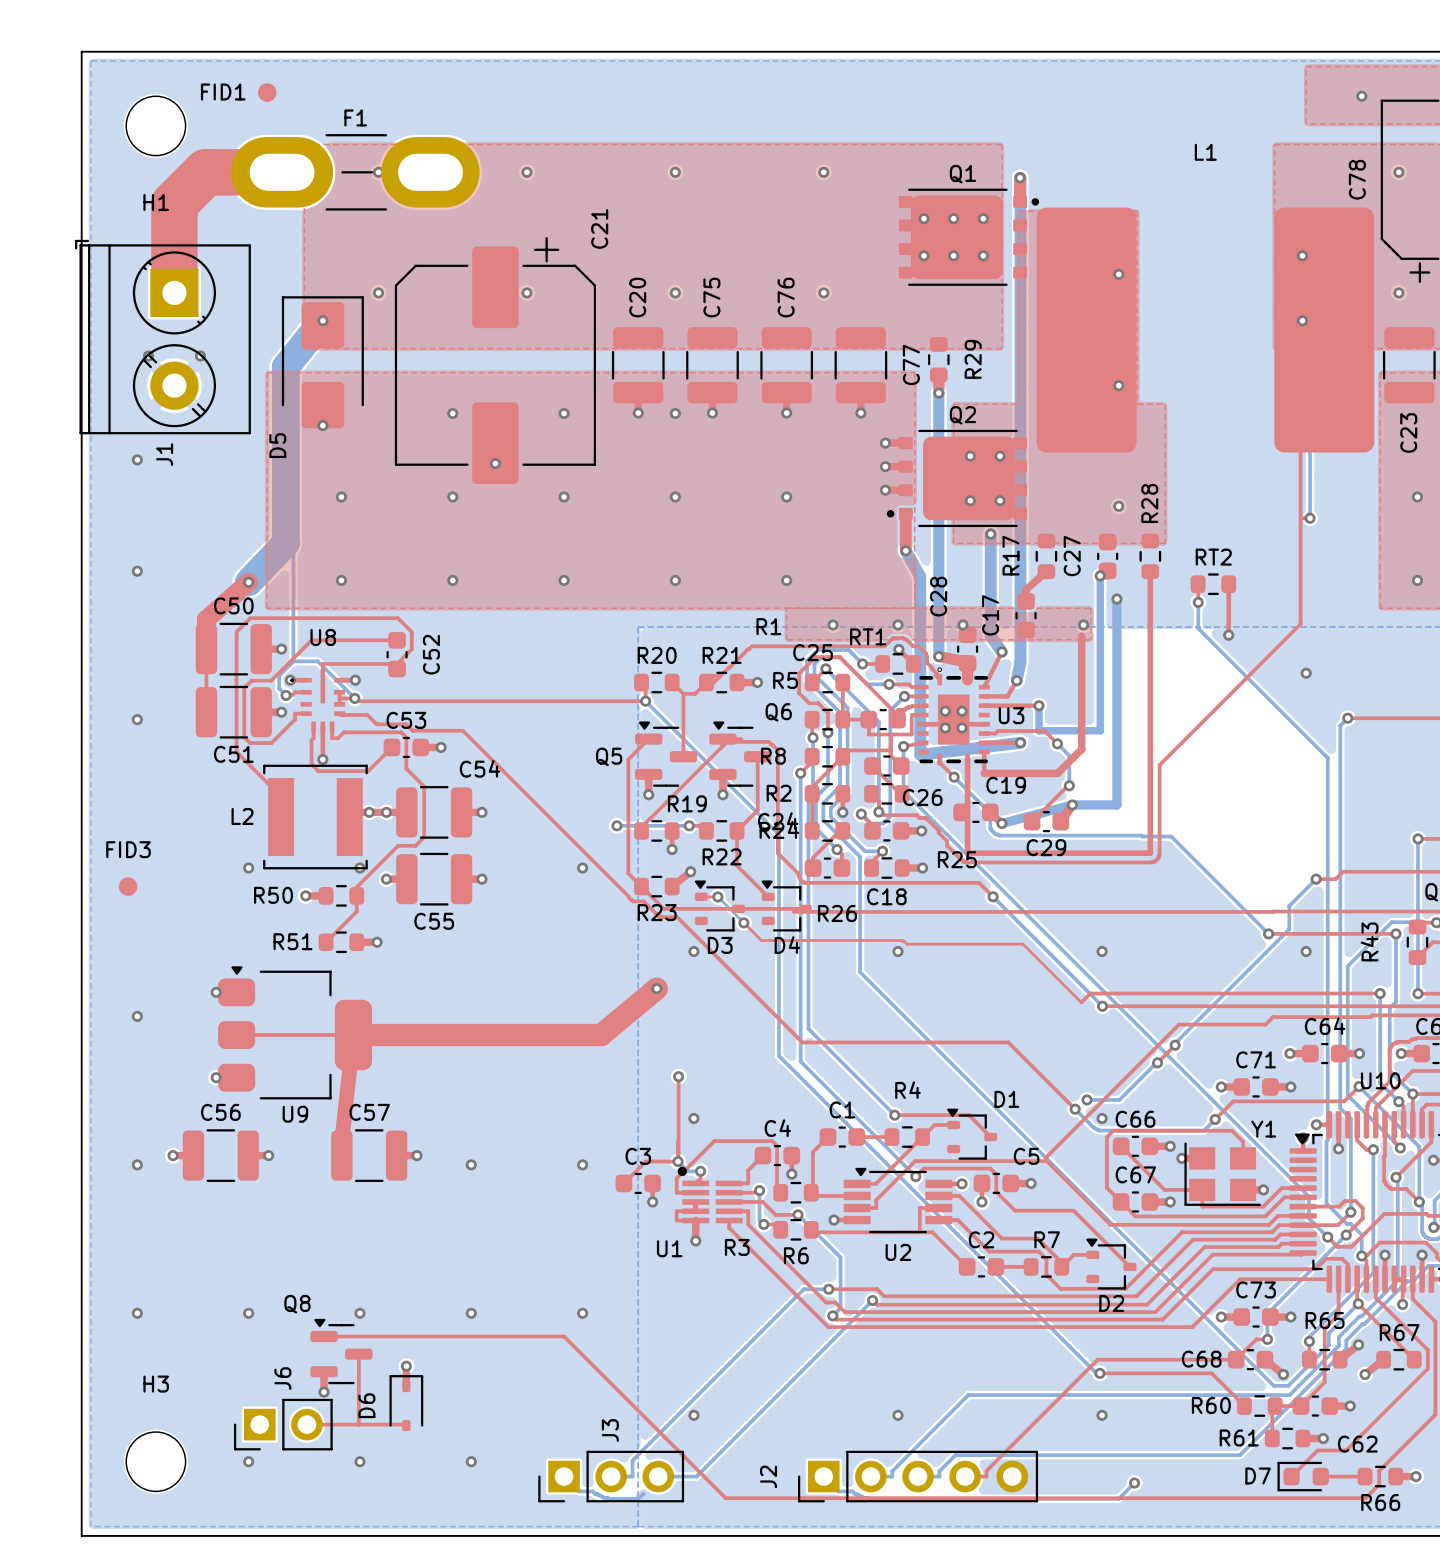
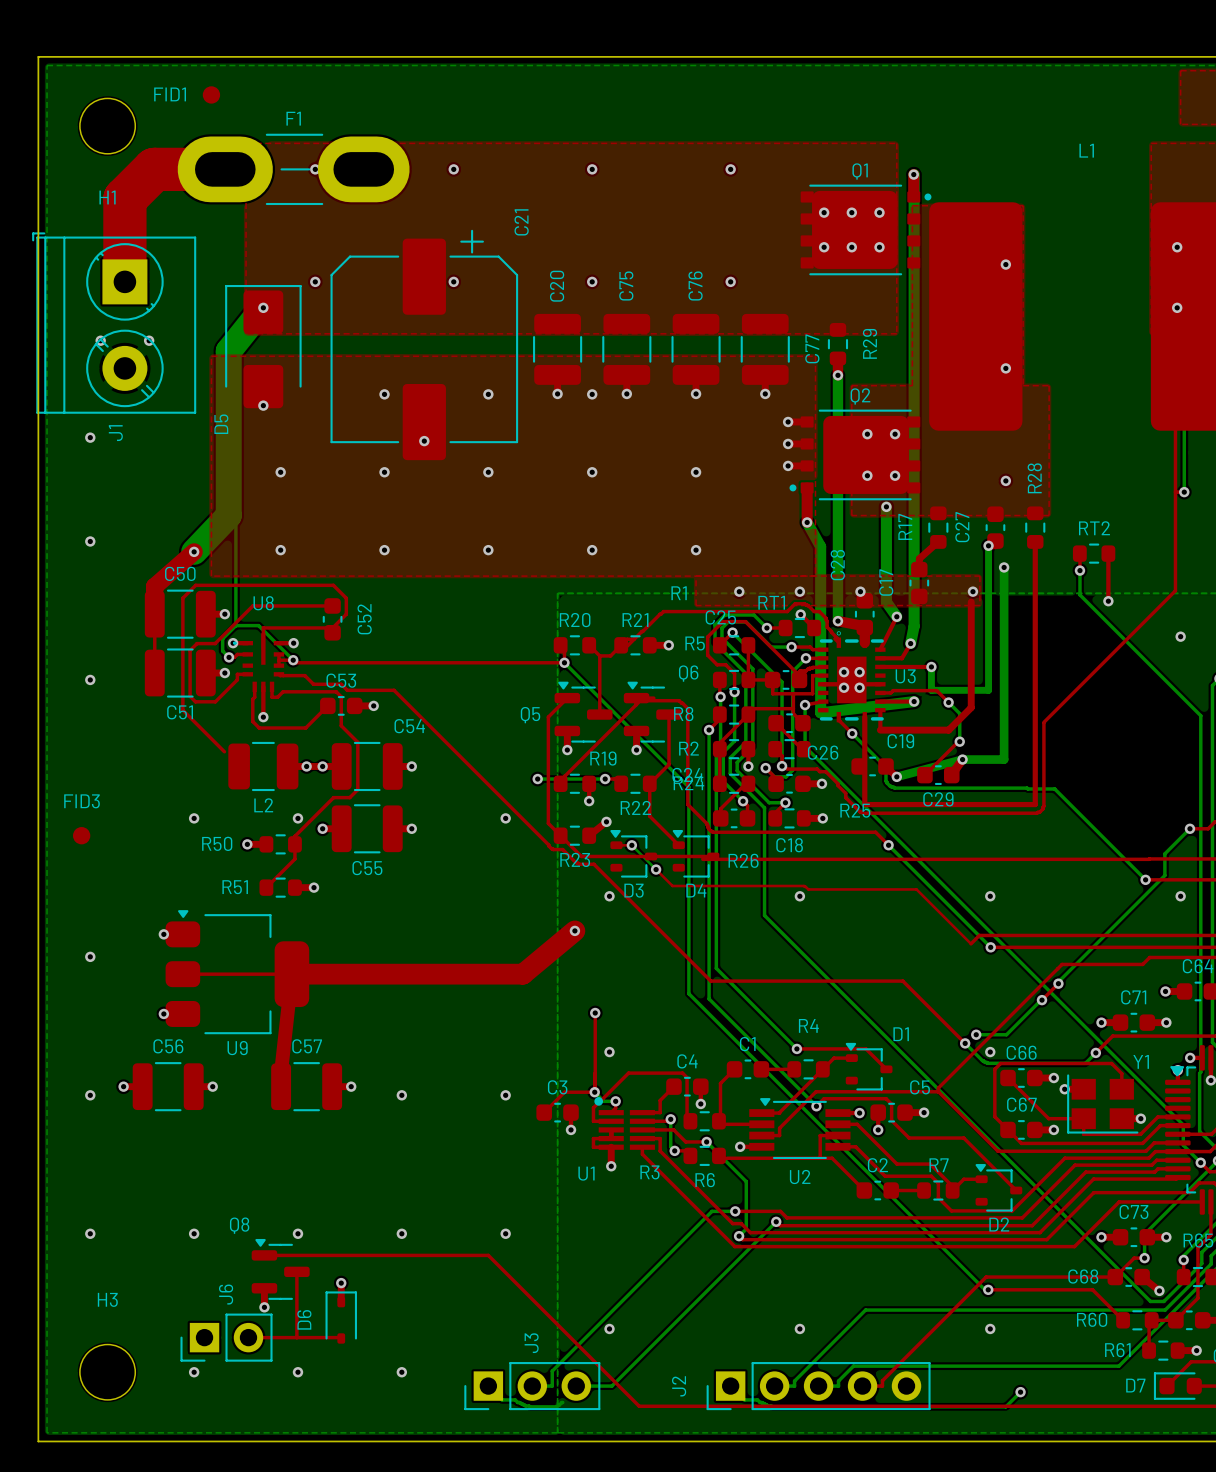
L2 footprint: [263, 764, 368, 870] -> [228, 741, 299, 792]
L2 name position: L2 (242, 816) -> L2 (263, 805)

